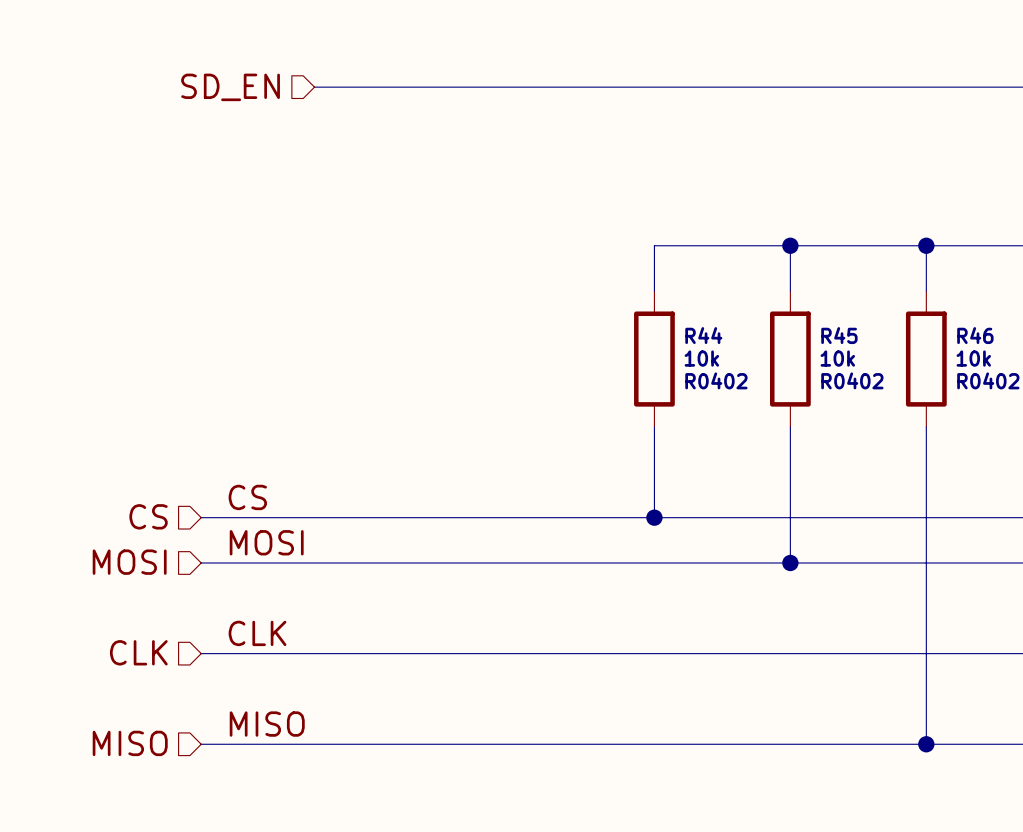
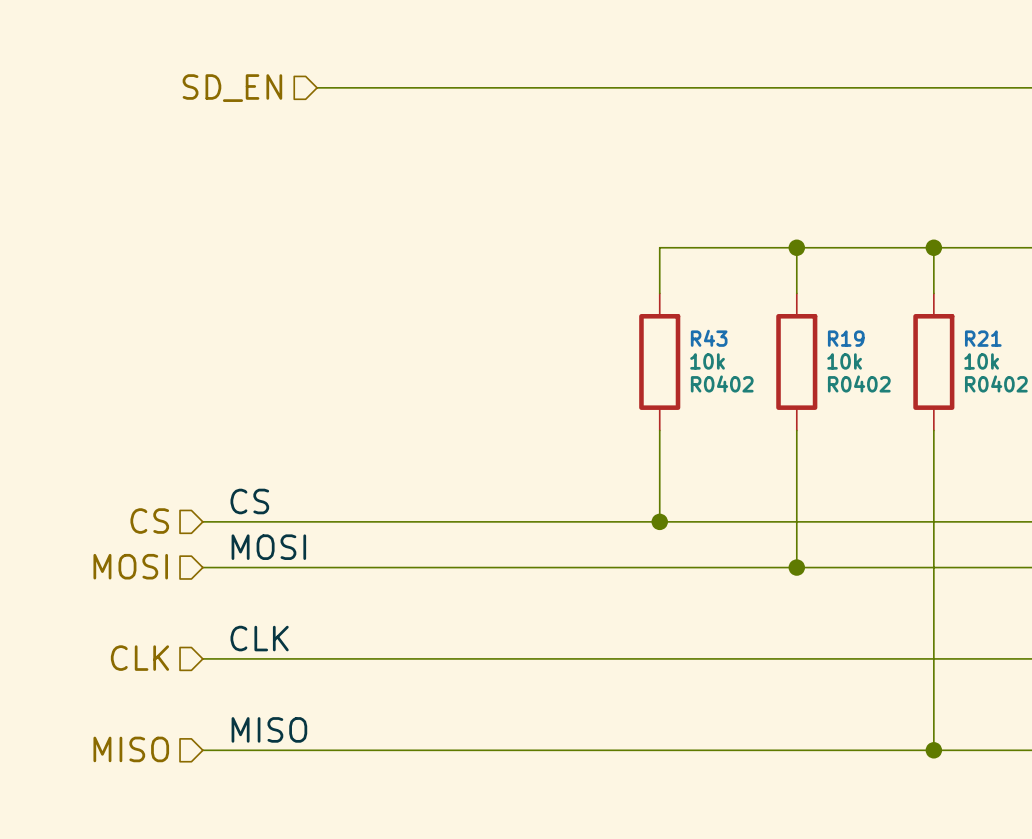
R44 name: R44 (703, 335) -> R43 (709, 338)
R45 name: R45 (839, 335) -> R19 (846, 338)
R46 name: R46 (975, 335) -> R21 (983, 338)

